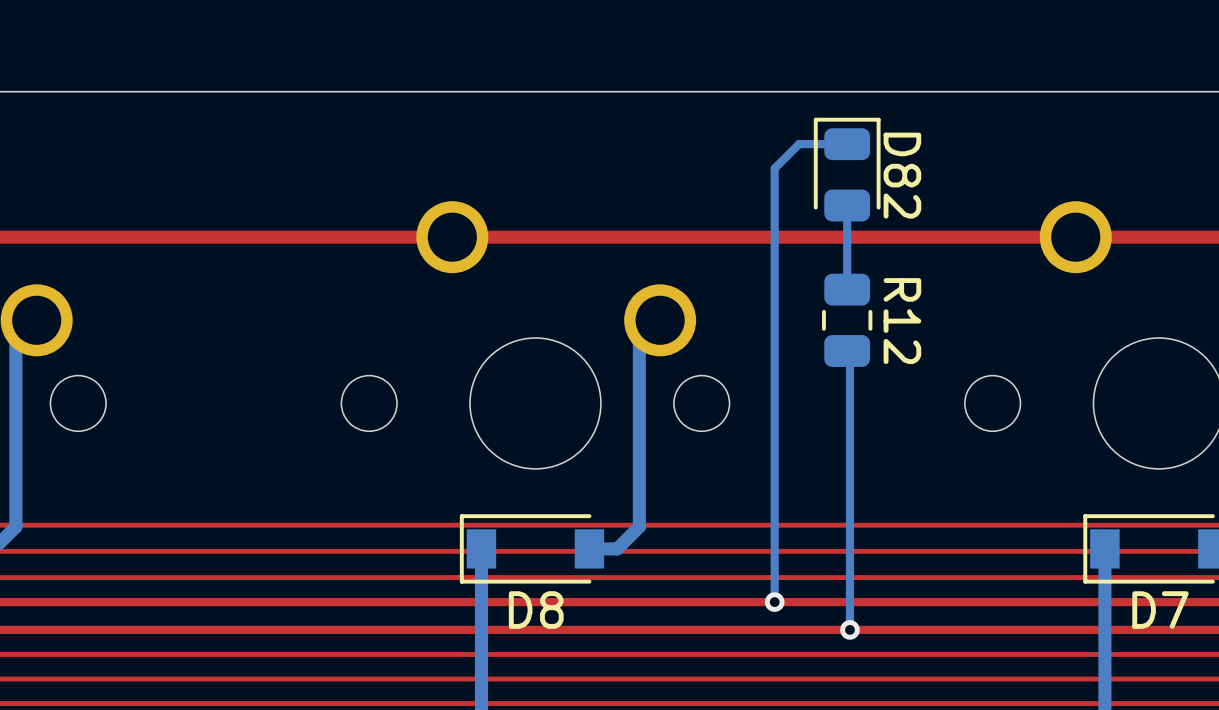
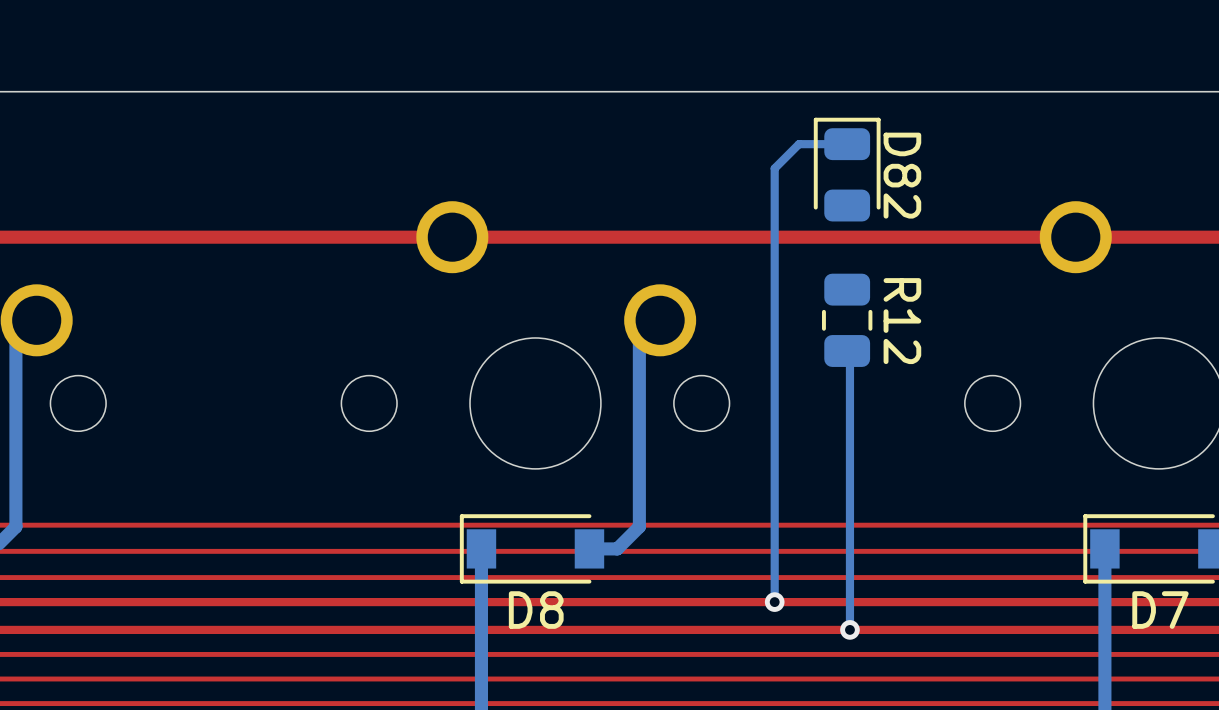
bottom track: (847, 205) (847, 289) -> none

